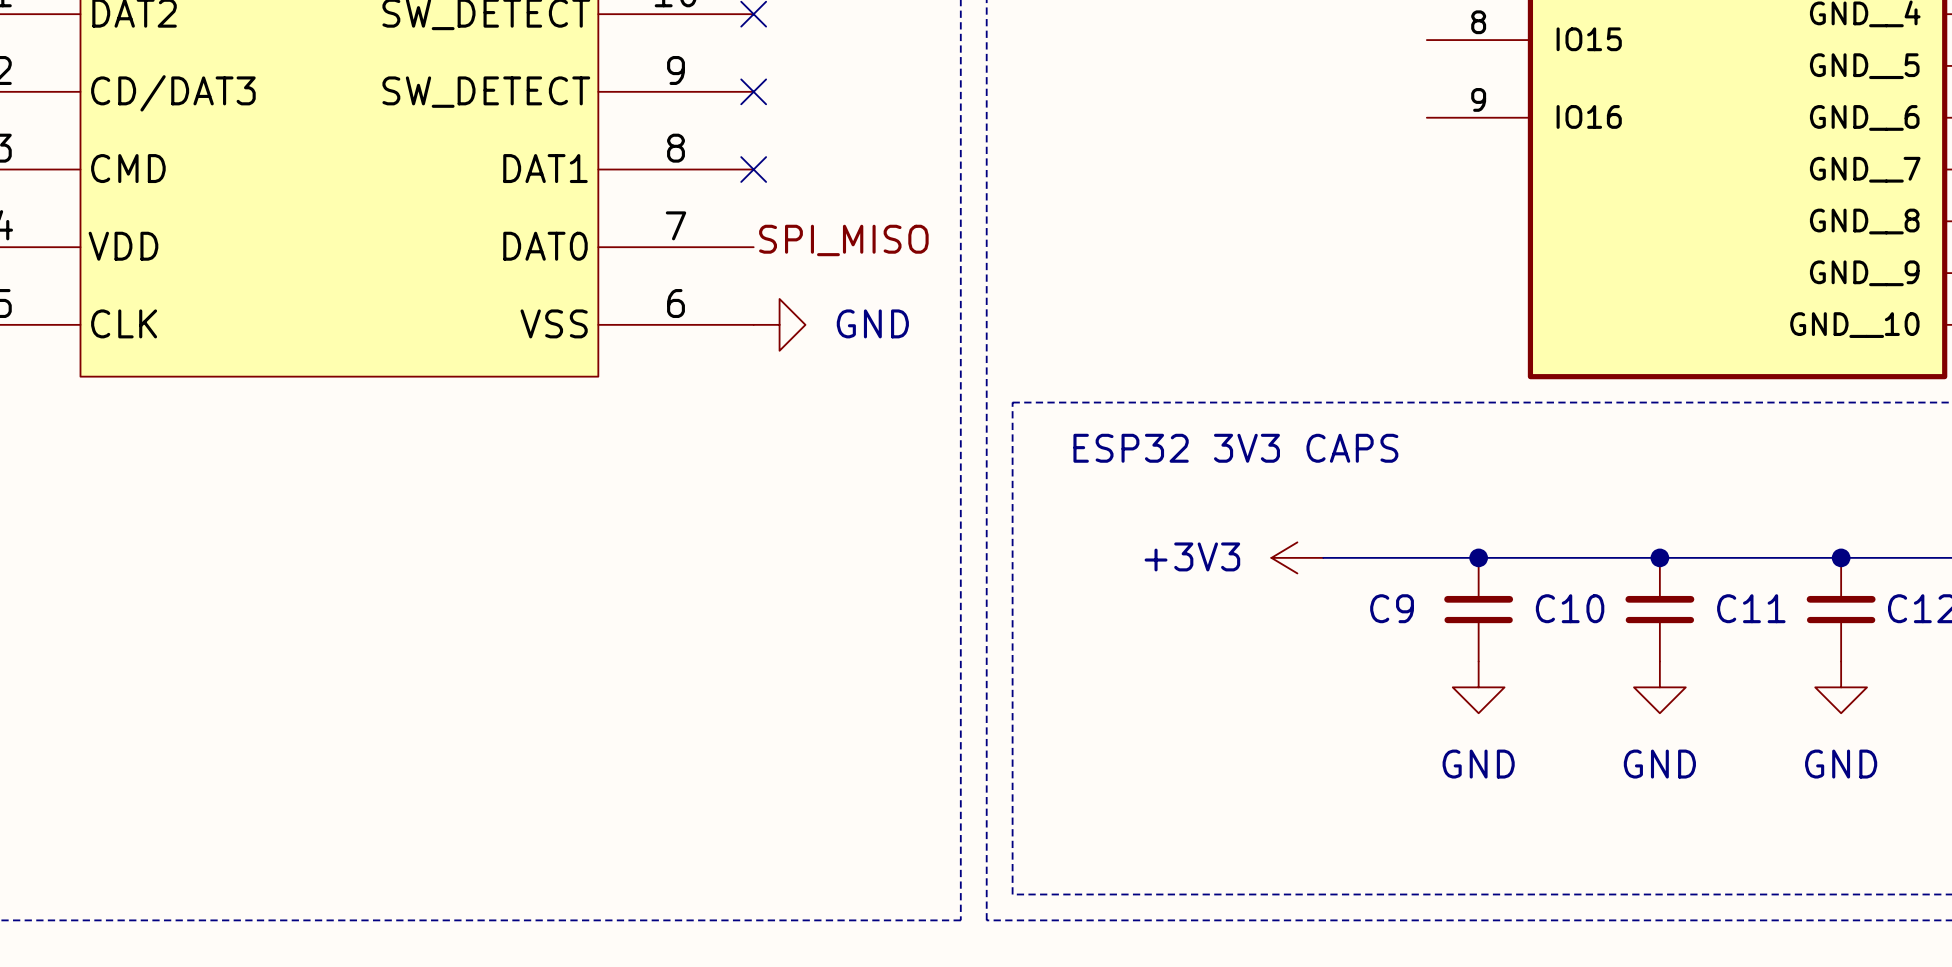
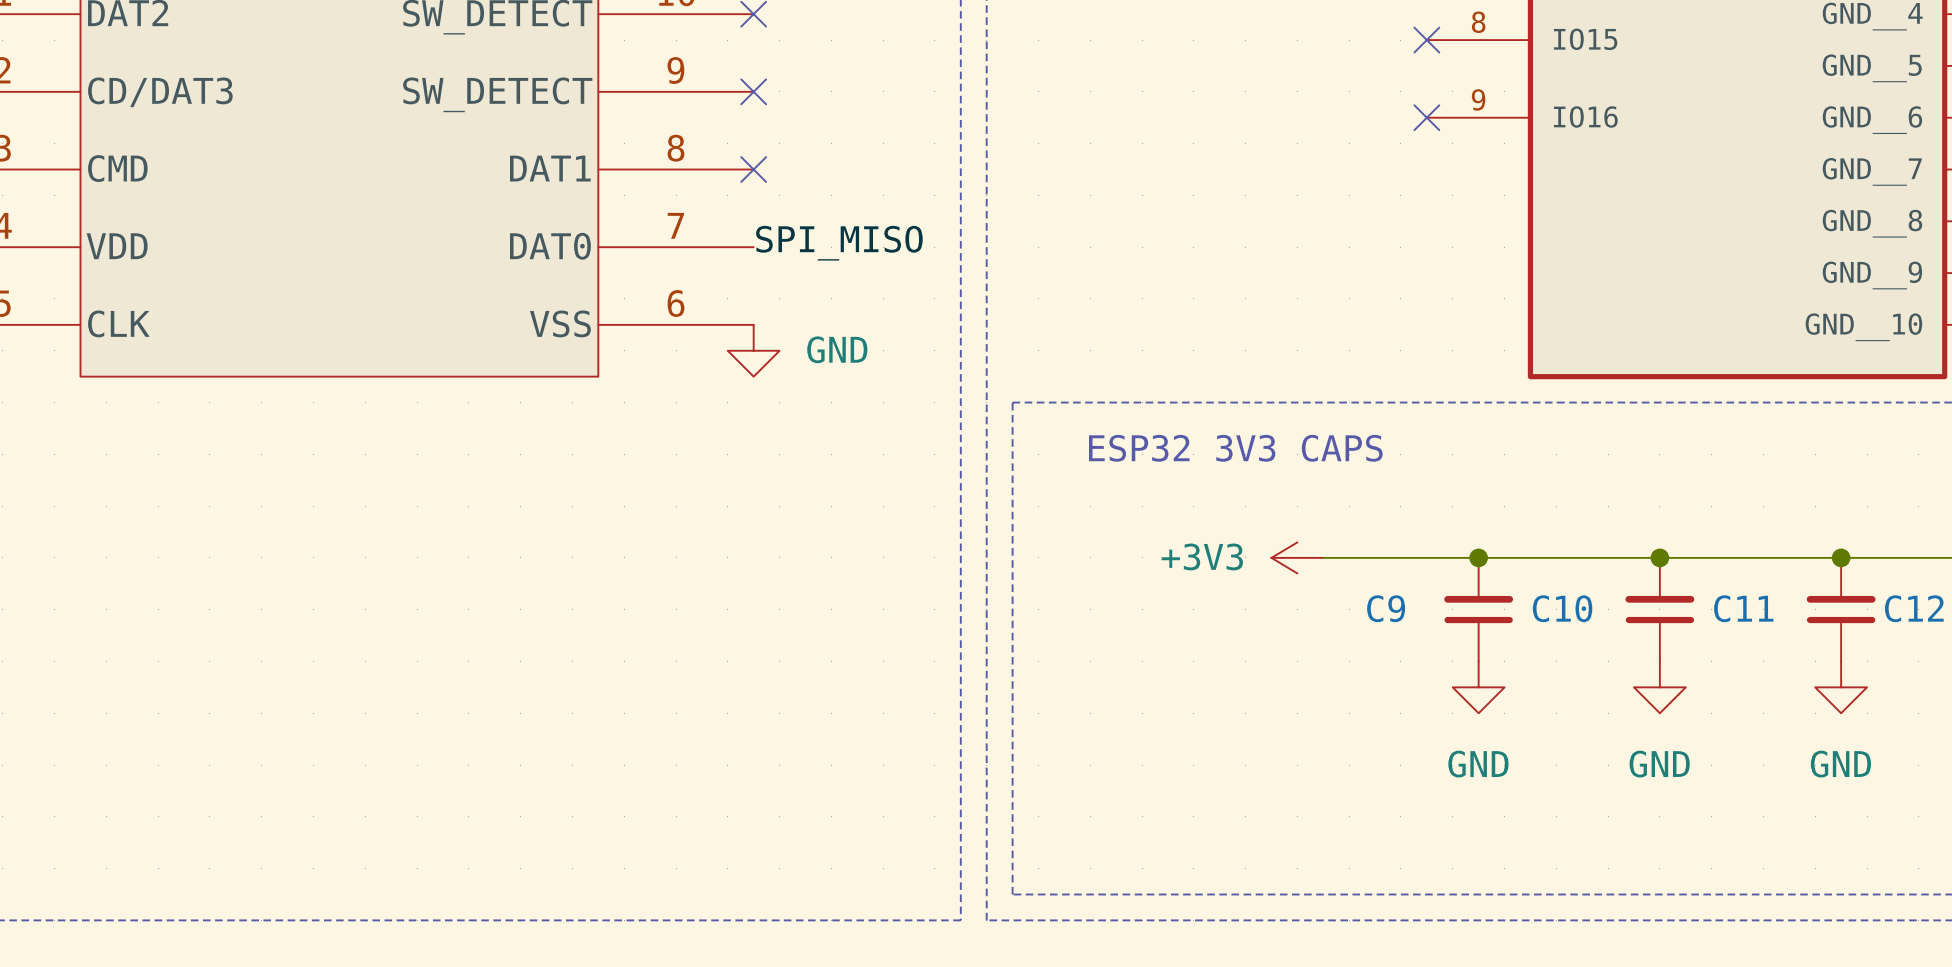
no-connect mark: none -> (1426, 40)
no-connect mark: none -> (1426, 117)
power symbol rotation: 0° (779, 324) -> 90° clockwise (753, 350)
power symbol position: GND (779, 324) -> GND (753, 350)

